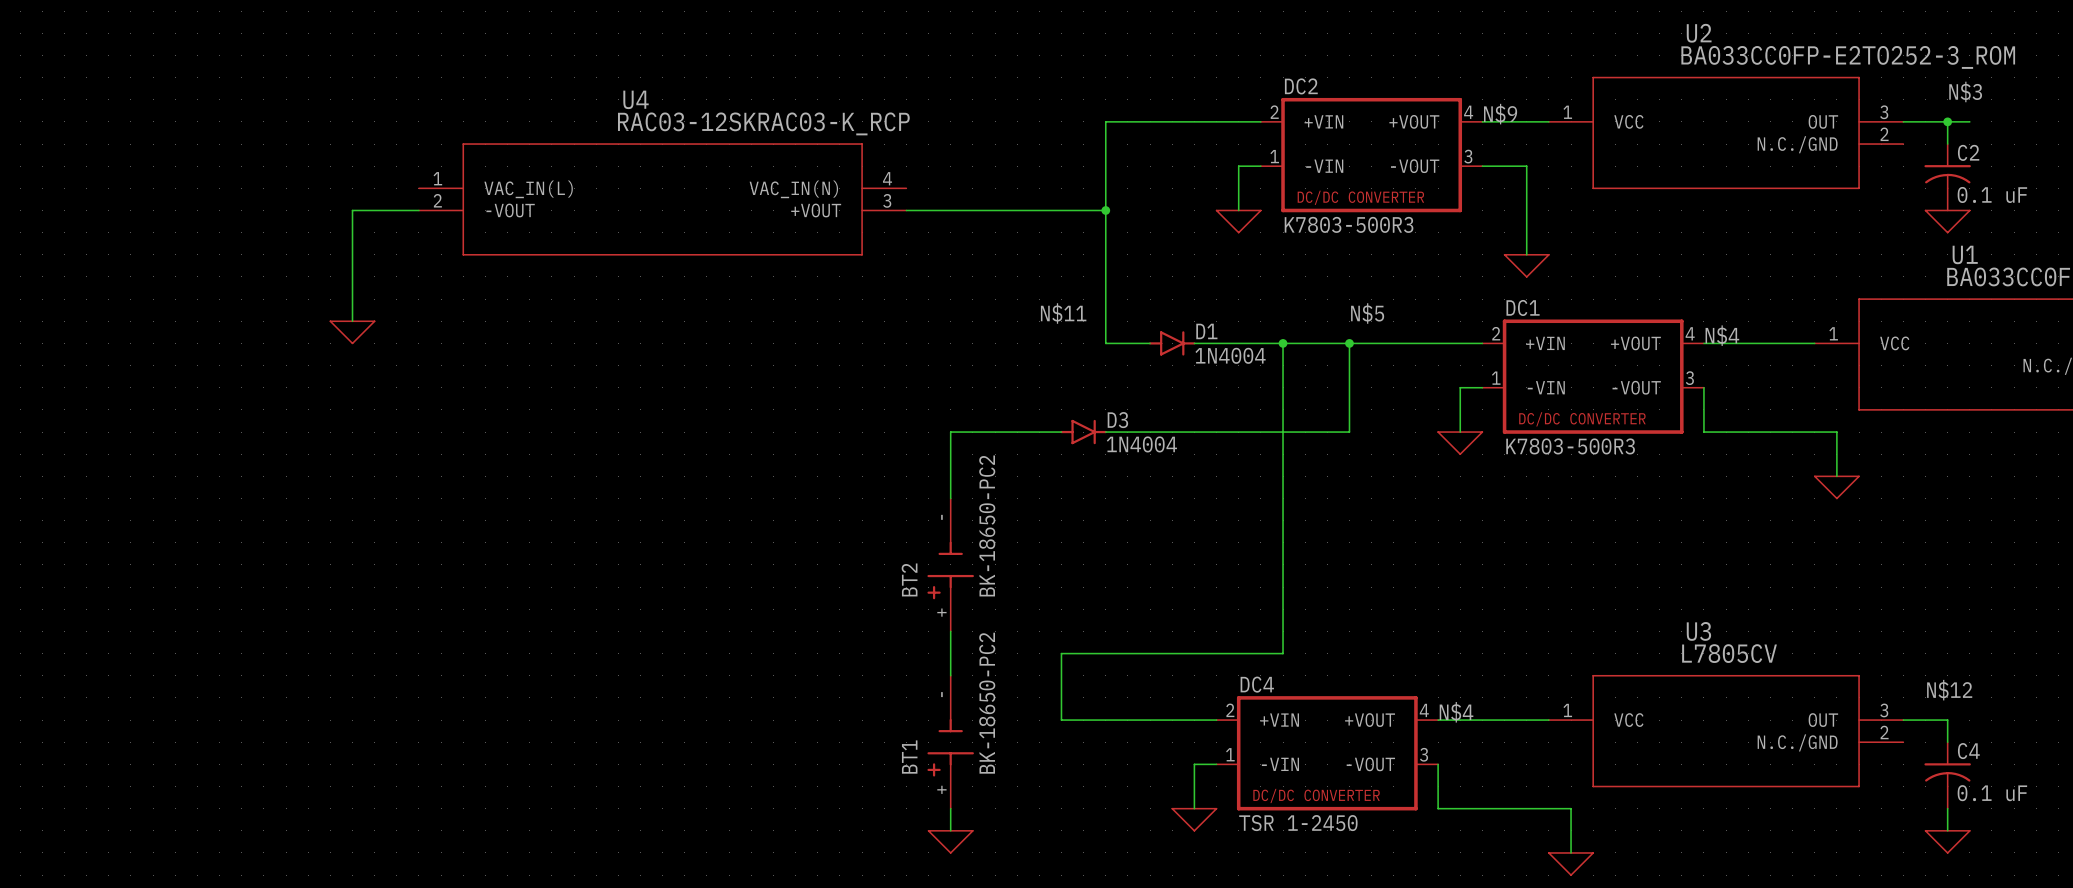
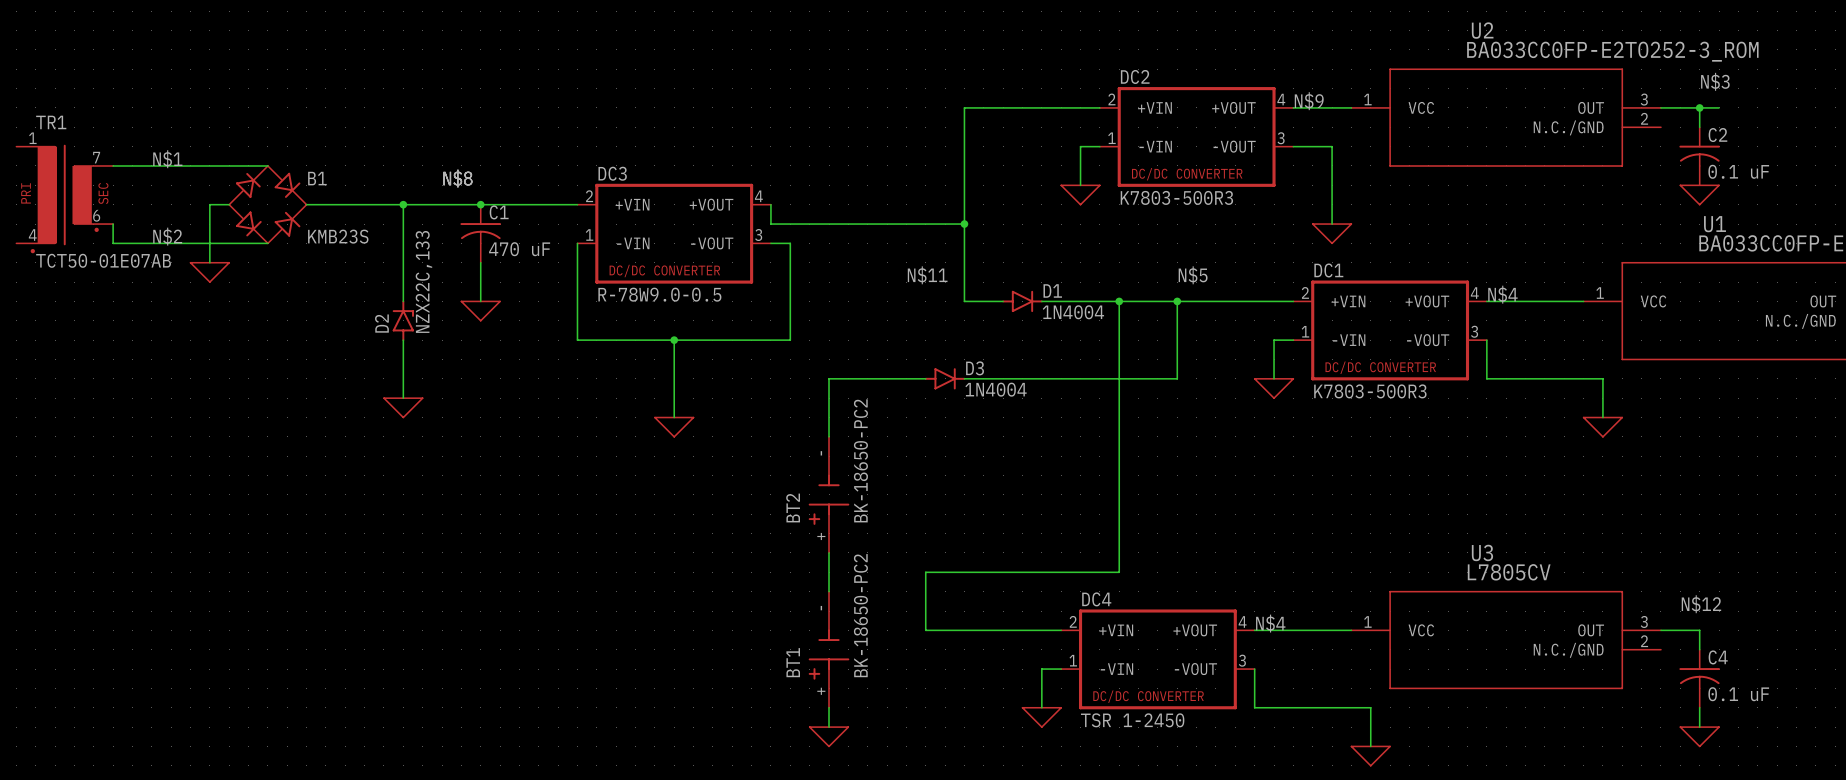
label: none -> N$1 (167, 159)
wire: none -> (113, 165) (267, 165)
U4: RAC03-12SKRAC03-K_RCP (662, 199) -> none
label: none -> N$8 (457, 178)
wire: (418, 210) (352, 210) (352, 321) -> none
wire: (906, 210) (1105, 210) -> none
junction position: (1105, 210) -> (964, 224)
TR1: none -> TCT50-01E07AB (64, 198)
wire: none -> (229, 204) (209, 204) (209, 262)
B1: none -> KMB23S (267, 204)
wire: none -> (306, 204) (577, 204)
wire: none -> (403, 204) (403, 301)
junction: none -> (403, 204)
junction: none -> (480, 204)
wire: none -> (770, 204) (770, 224) (964, 224)
wire: none -> (113, 224) (113, 243) (267, 243)
C1: none -> 470 uF (480, 233)
DC3: none -> R-78W9.0-0.5 (674, 233)
label: none -> N$2 (167, 236)
wire: none -> (577, 243) (577, 340) (790, 340) (790, 243) (770, 243)
wire: none -> (480, 262) (480, 301)
power symbol: none -> (209, 272)
power symbol: (352, 332) -> none
power symbol: none -> (480, 311)
D2: none -> NZX22C,133 (403, 320)
wire: none -> (403, 340) (403, 398)
wire: none -> (674, 340) (674, 417)
junction: none -> (674, 340)
power symbol: none -> (403, 407)
power symbol: none -> (674, 427)

